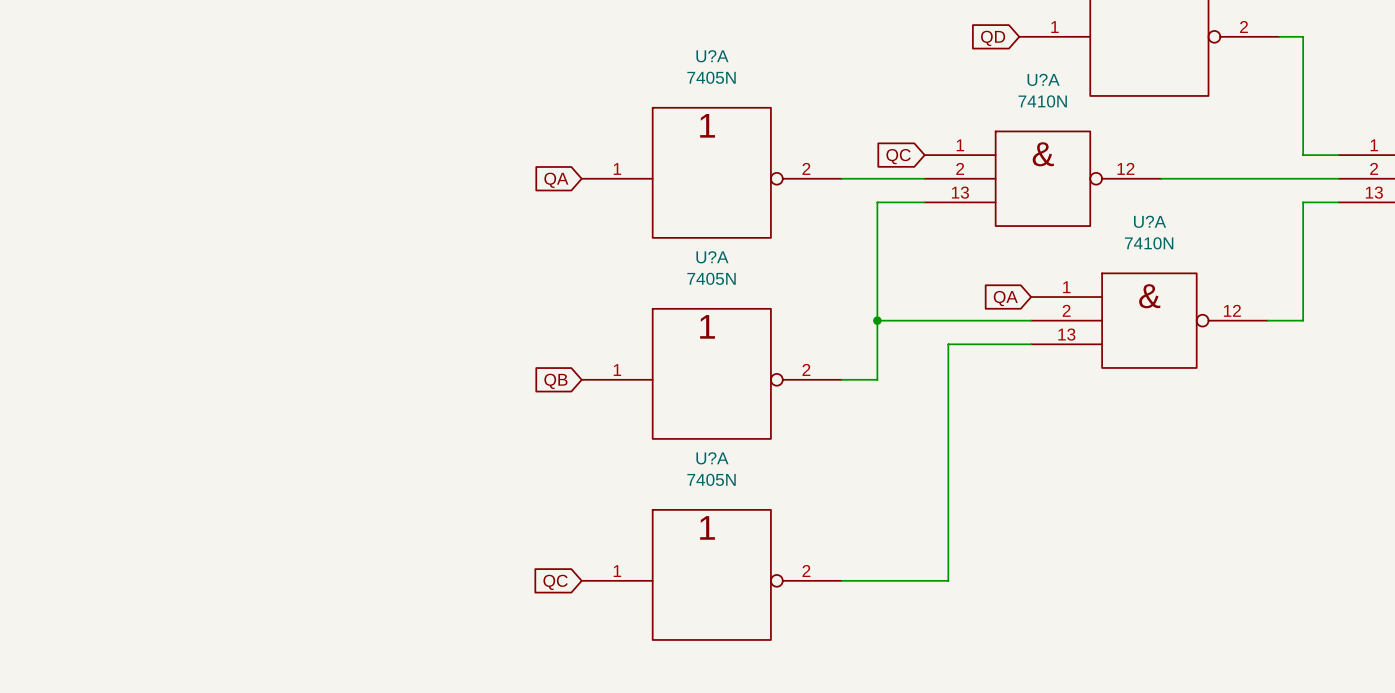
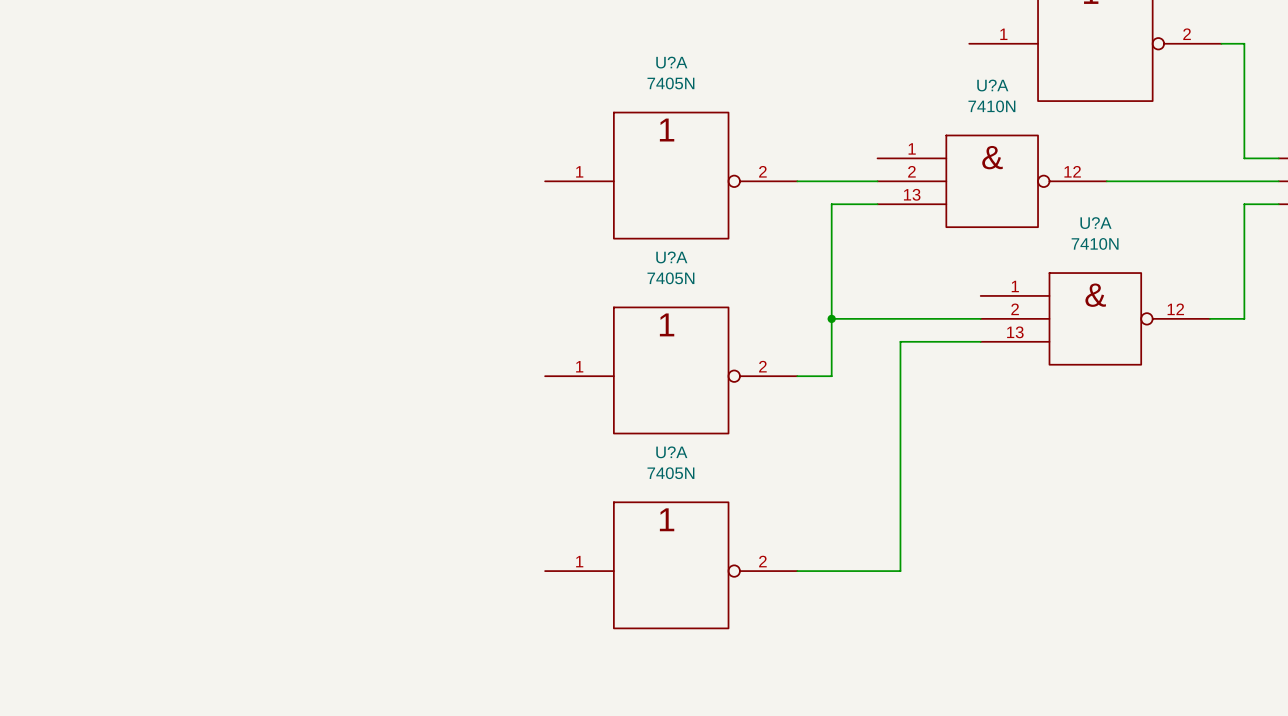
global label: QD (993, 38) -> none
global label: QC (898, 156) -> none
global label: QA (556, 180) -> none
global label: QA (1005, 298) -> none
global label: QB (555, 381) -> none
global label: QC (555, 582) -> none

